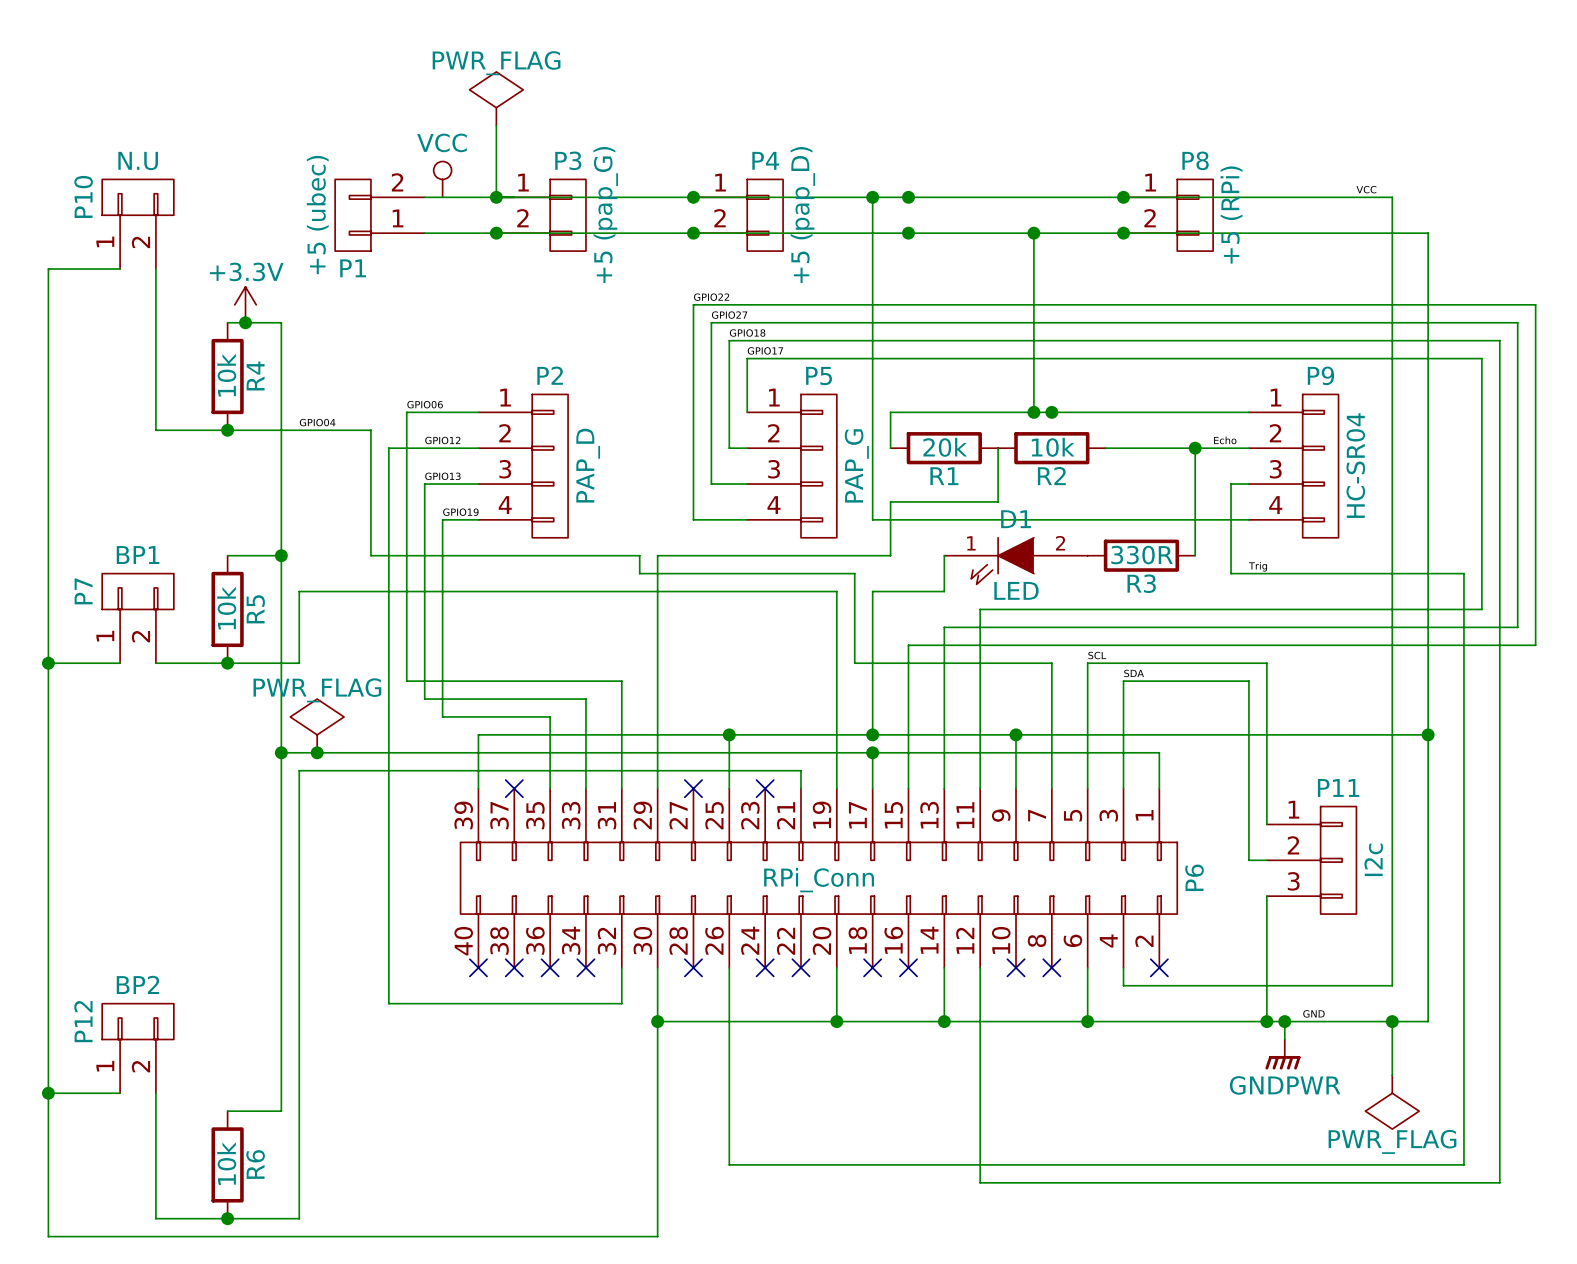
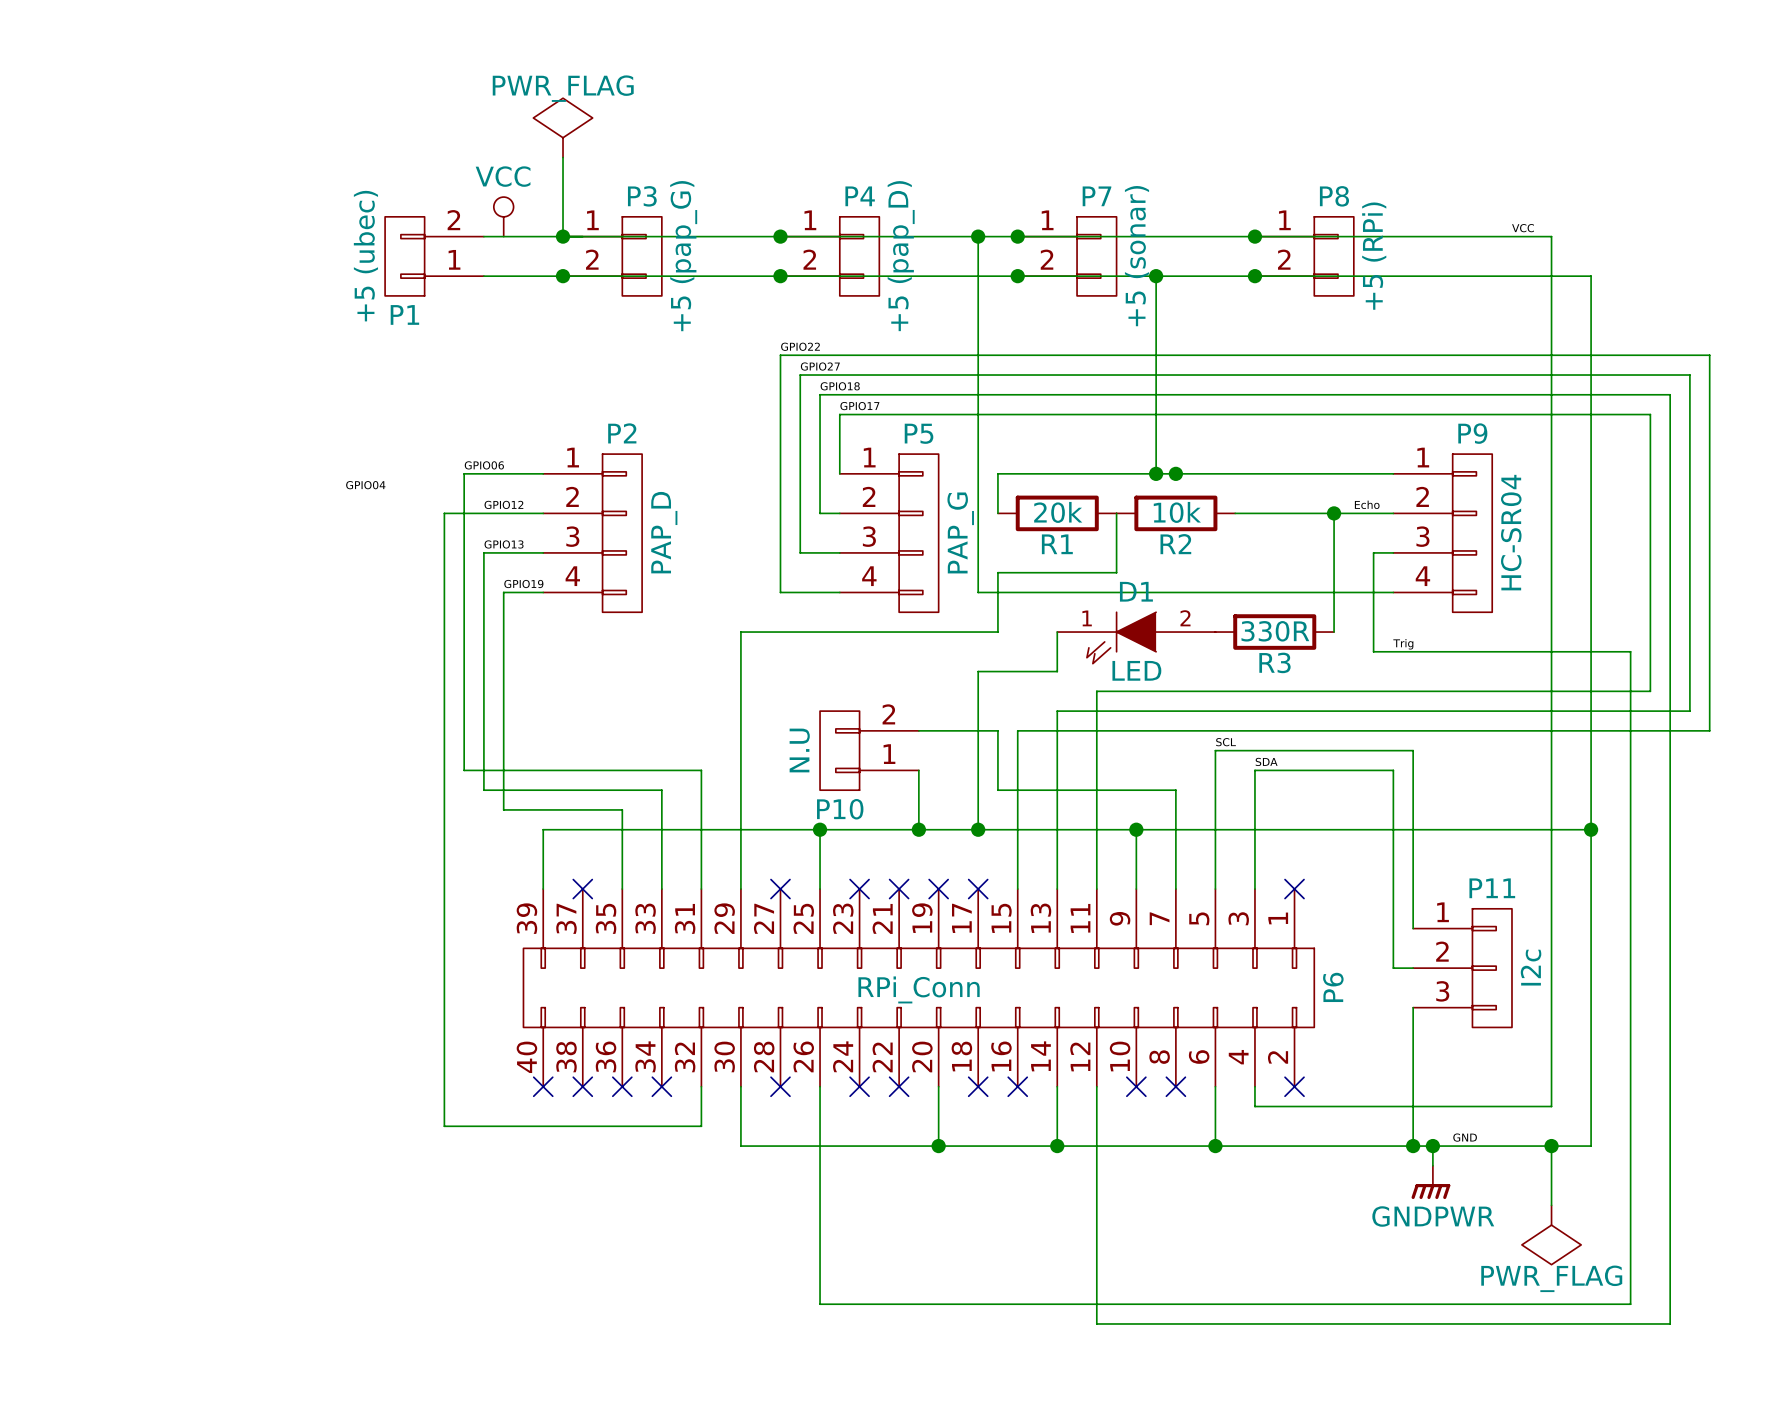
P10 rotation: 0° (138, 197) -> 90° counterclockwise (839, 750)
P10 position: (138, 224) -> (869, 750)
wire: (120, 269) (48, 269) (48, 1236) (657, 1236) (657, 1021) -> none
wire: (155, 269) (155, 430) (370, 430) (370, 555) (639, 555) (639, 573) (854, 573) (854, 663) (1051, 663) (1051, 699) -> (918, 730) (997, 730) (997, 790) (1175, 790)
power symbol: +3.3V (245, 304) -> none
wire: (227, 322) (281, 322) (281, 1111) (227, 1111) -> none
junction: (245, 322) -> none
R4: 10k (227, 376) -> none
junction: (227, 430) -> none
P7 value: BP1 (138, 555) -> +5 (sonar) (1137, 256)
wire: (227, 555) (281, 555) -> none
junction: (281, 555) -> none
P7 rotation: 0° (138, 591) -> 90° clockwise (1096, 256)
R5: 10k (227, 609) -> none
P7 position: (138, 618) -> (1067, 256)
wire: (48, 663) (120, 663) -> none
junction: (48, 663) -> none
wire: (155, 663) (299, 663) (299, 591) (836, 591) (836, 788) -> none
junction: (227, 663) -> none
wire: none -> (918, 770) (918, 829)
power symbol: PWR_FLAG (317, 725) -> none
wire: (281, 752) (1159, 752) (1159, 788) -> none
junction: (281, 752) -> none
junction: (317, 752) -> none
wire: (872, 752) (872, 788) -> none
junction position: (872, 752) -> (918, 829)
wire: (800, 788) (800, 770) (299, 770) (299, 1218) (155, 1218) (155, 1093) -> none
no-connect mark: none -> (899, 889)
no-connect mark: none -> (938, 889)
no-connect mark: none -> (978, 889)
no-connect mark: none -> (1294, 889)
junction: (657, 1021) -> none
P12: BP2 (138, 1048) -> none
wire: (48, 1093) (120, 1093) -> none
junction: (48, 1093) -> none
R6: 10k (227, 1164) -> none
junction: (227, 1218) -> none

